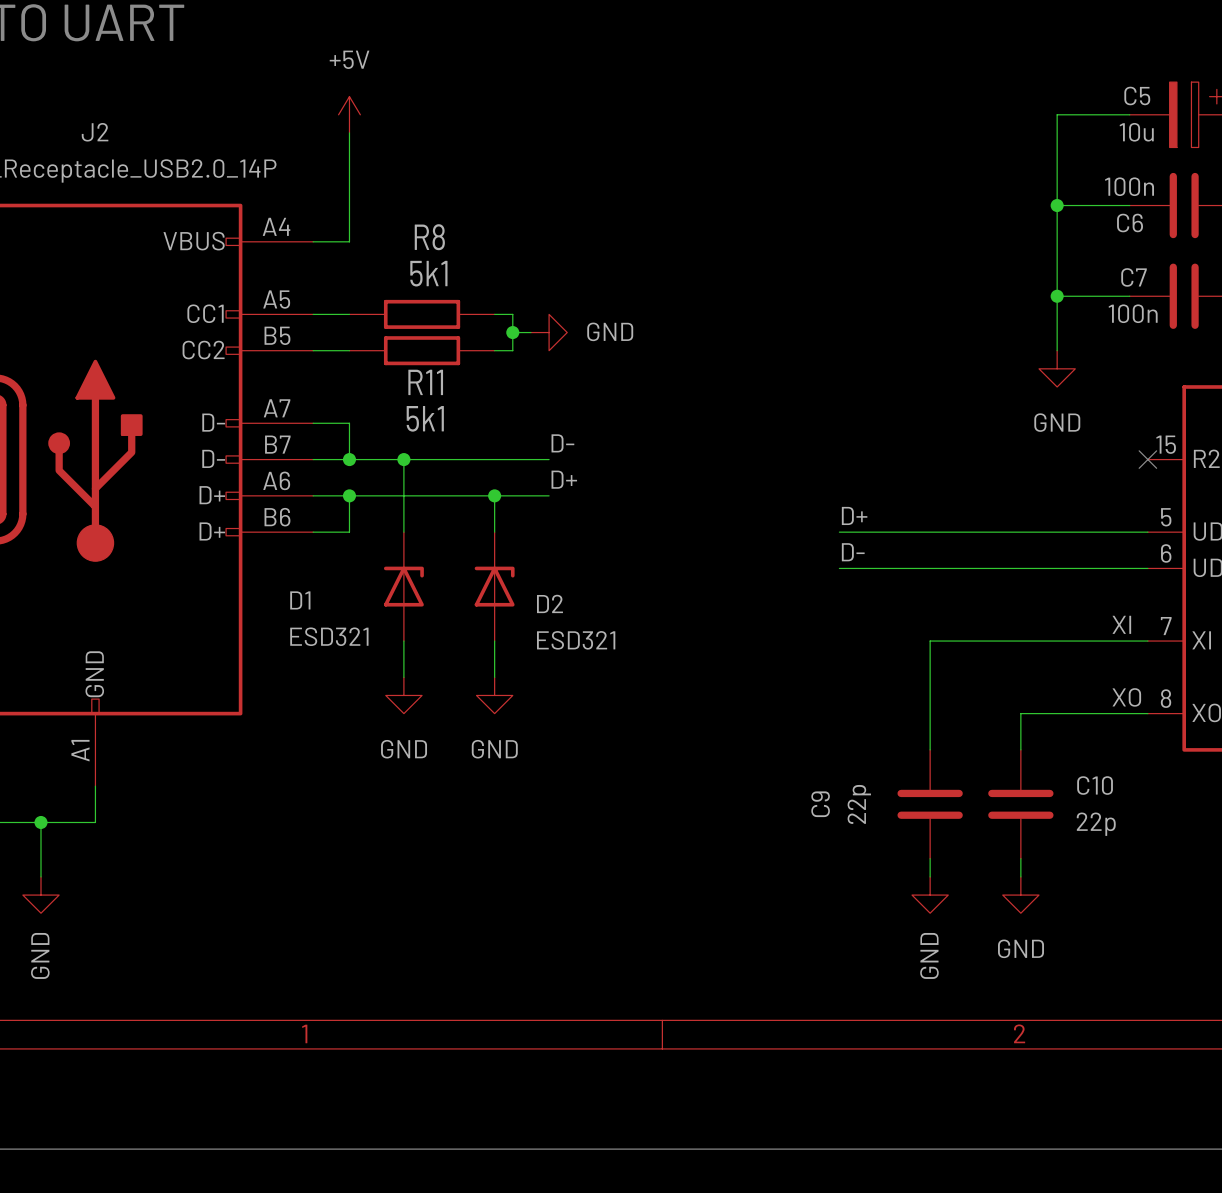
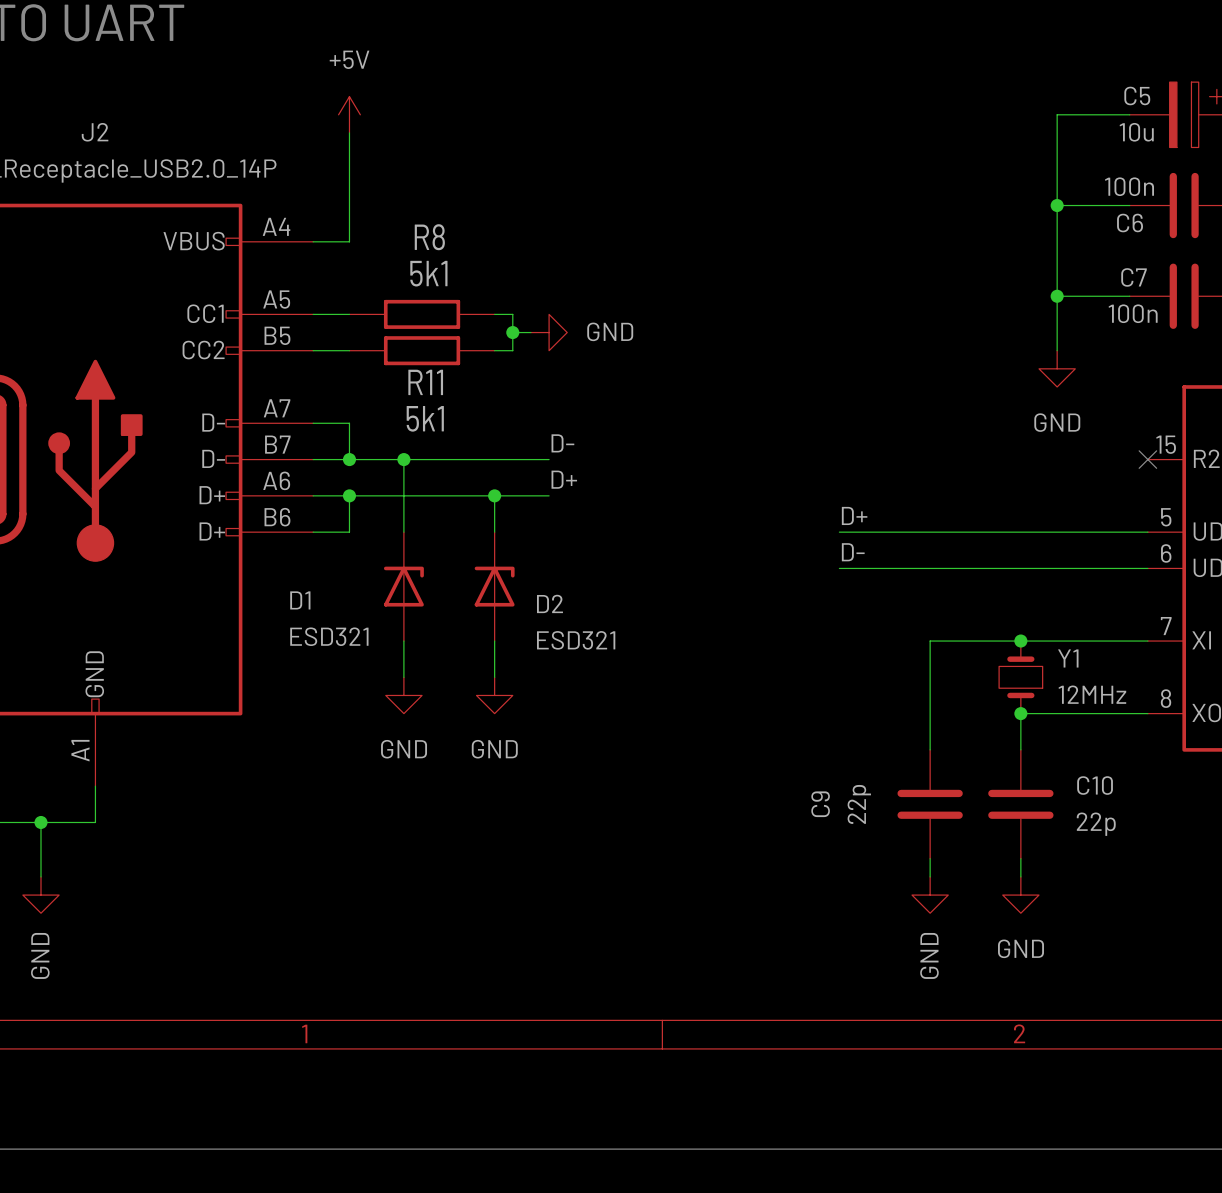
label: XI (1121, 624) -> none
junction: none -> (1020, 641)
Y1: none -> 12MHz (1020, 677)
label: XO (1126, 697) -> none
junction: none -> (1020, 713)

